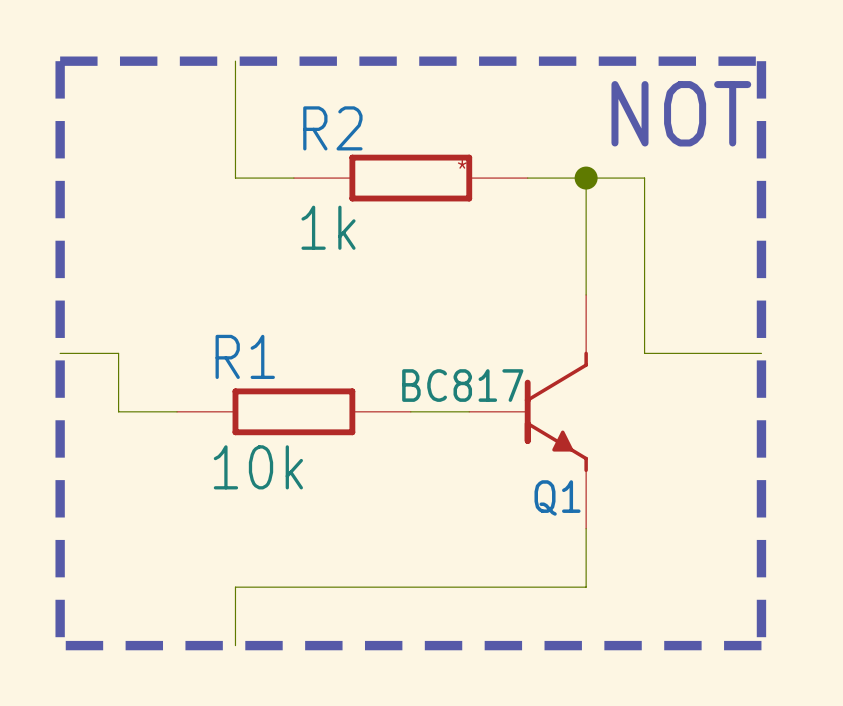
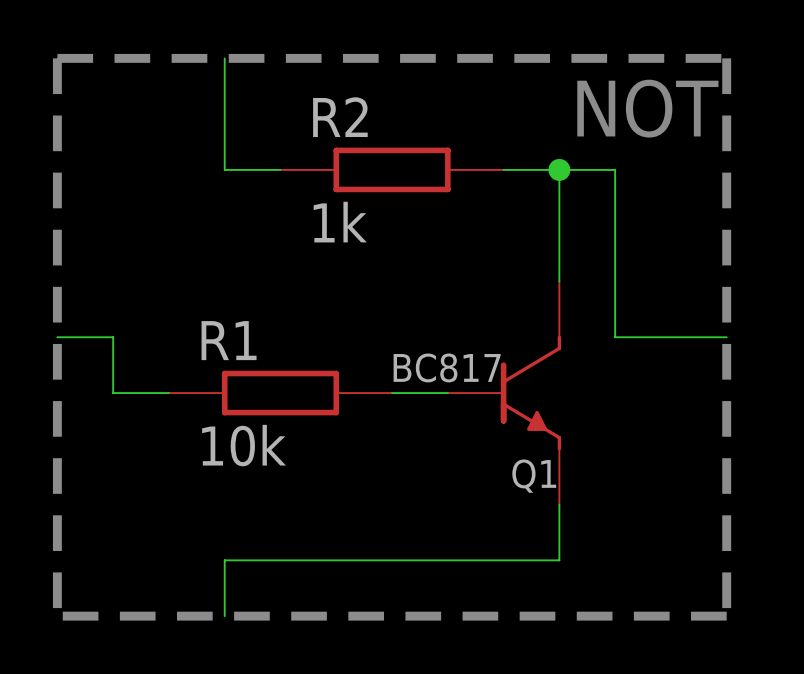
R2 name position: R2 (332, 128) -> R2 (340, 117)
R2 text: * (462, 164) -> none
R2 value position: 1k (328, 227) -> 1k (340, 222)

